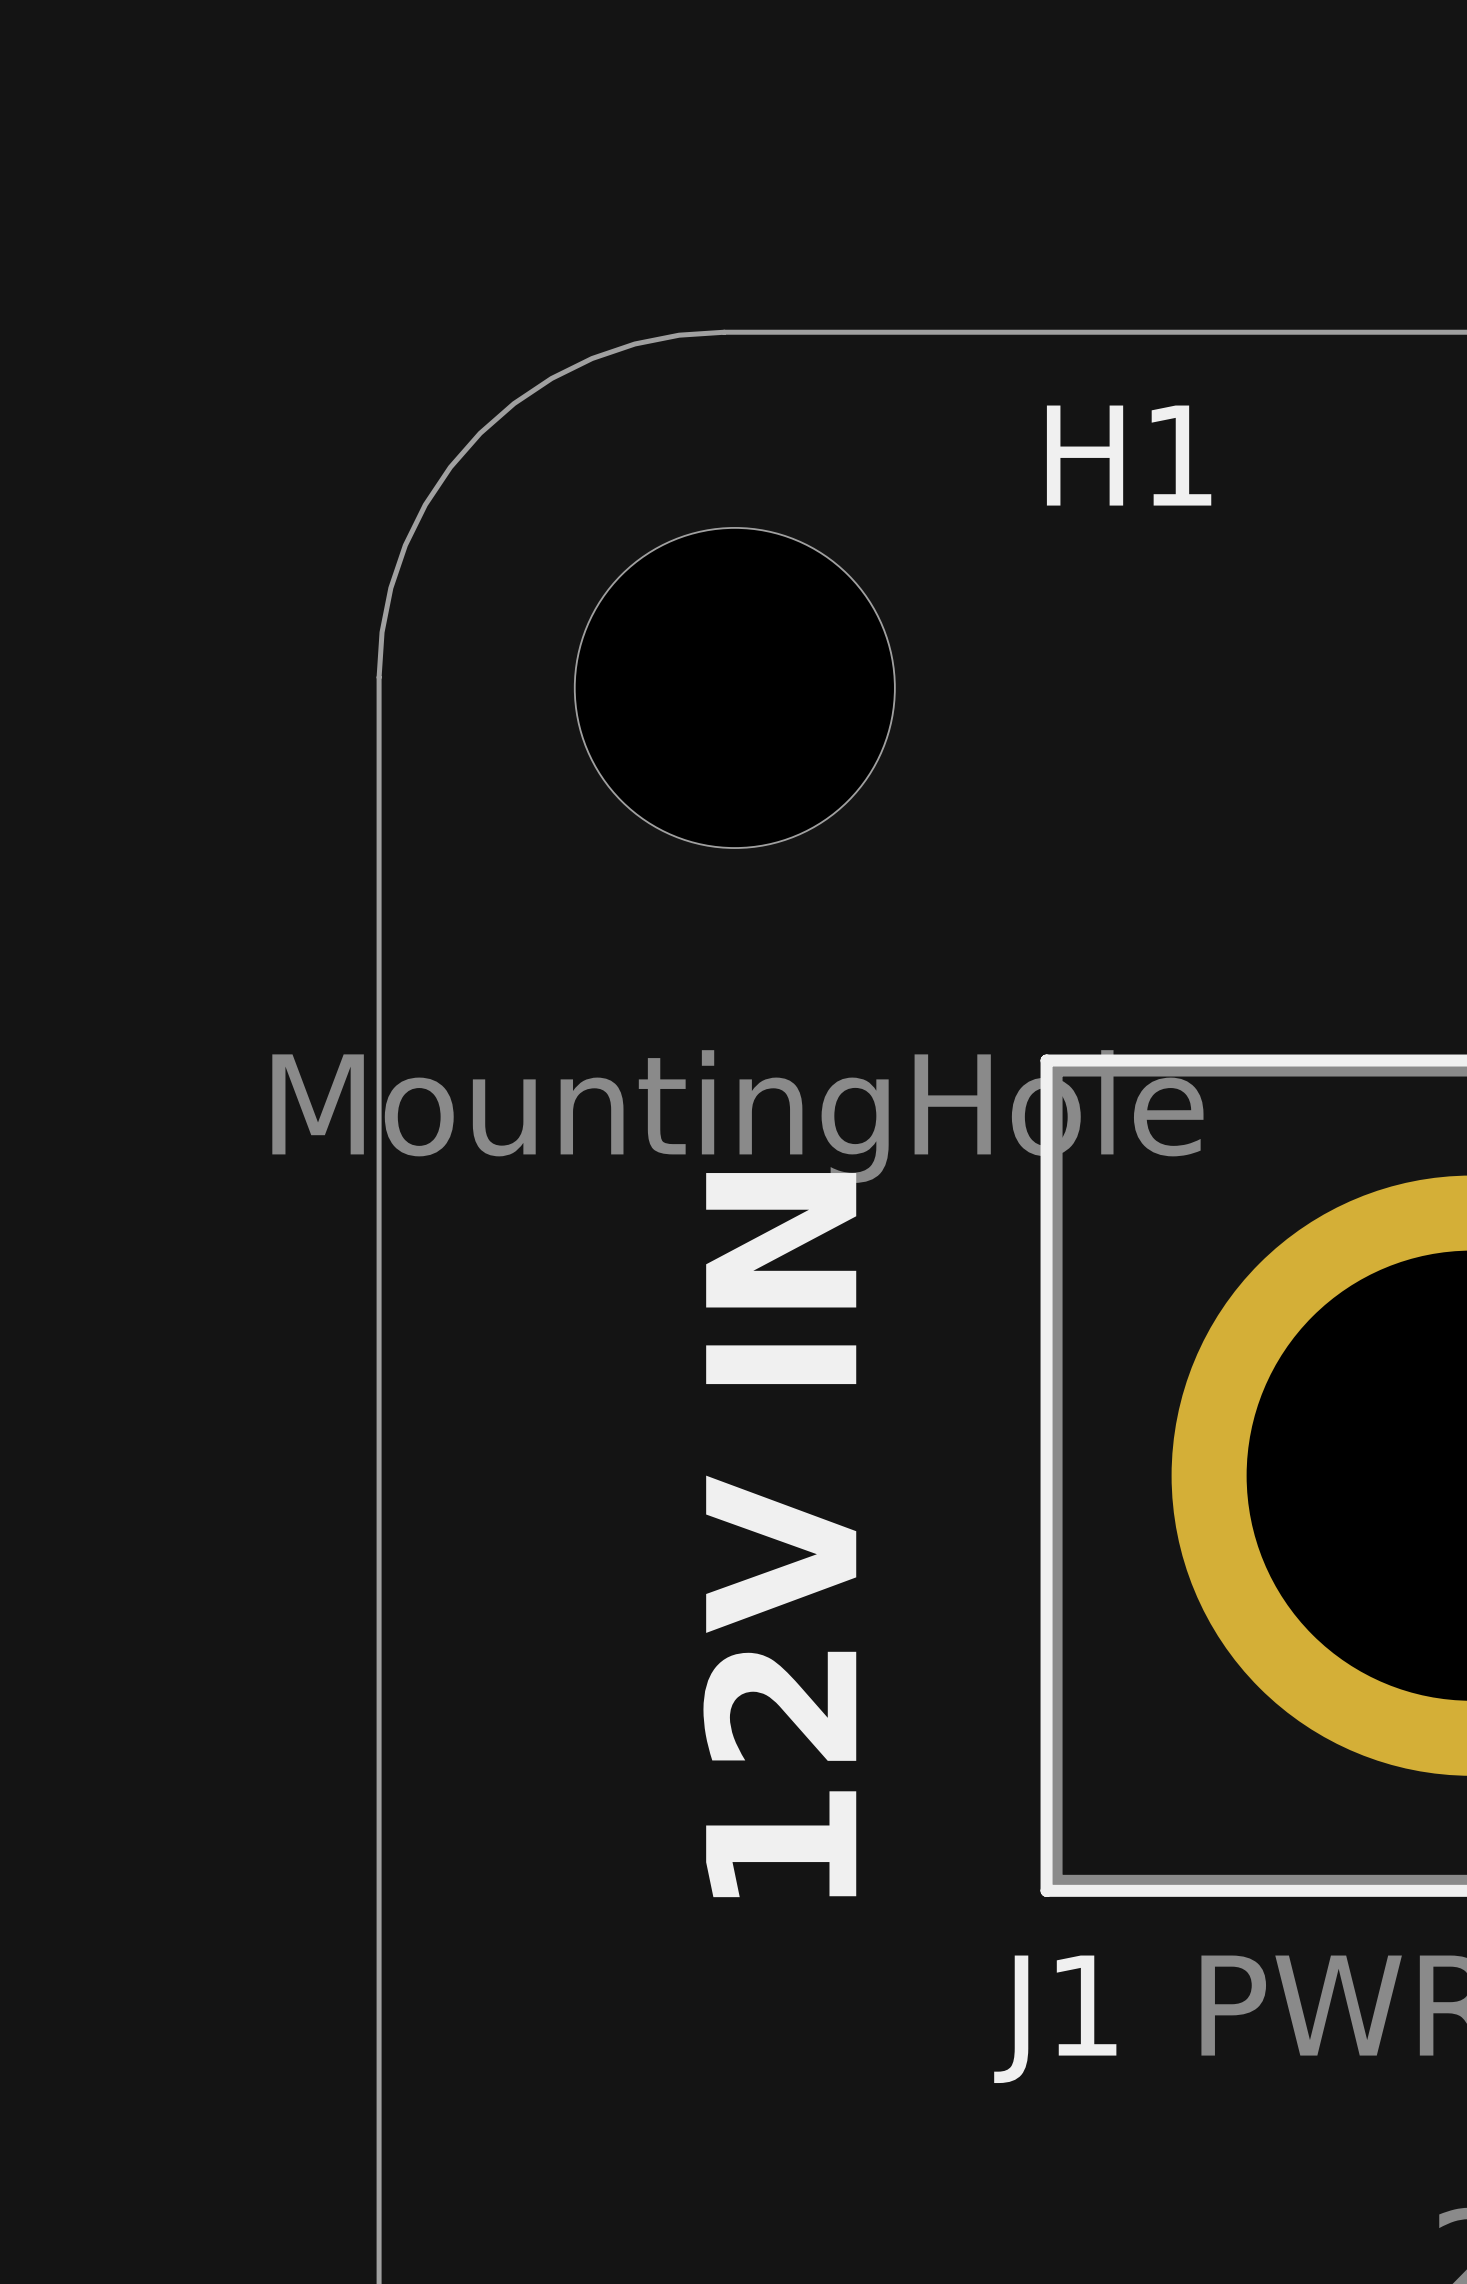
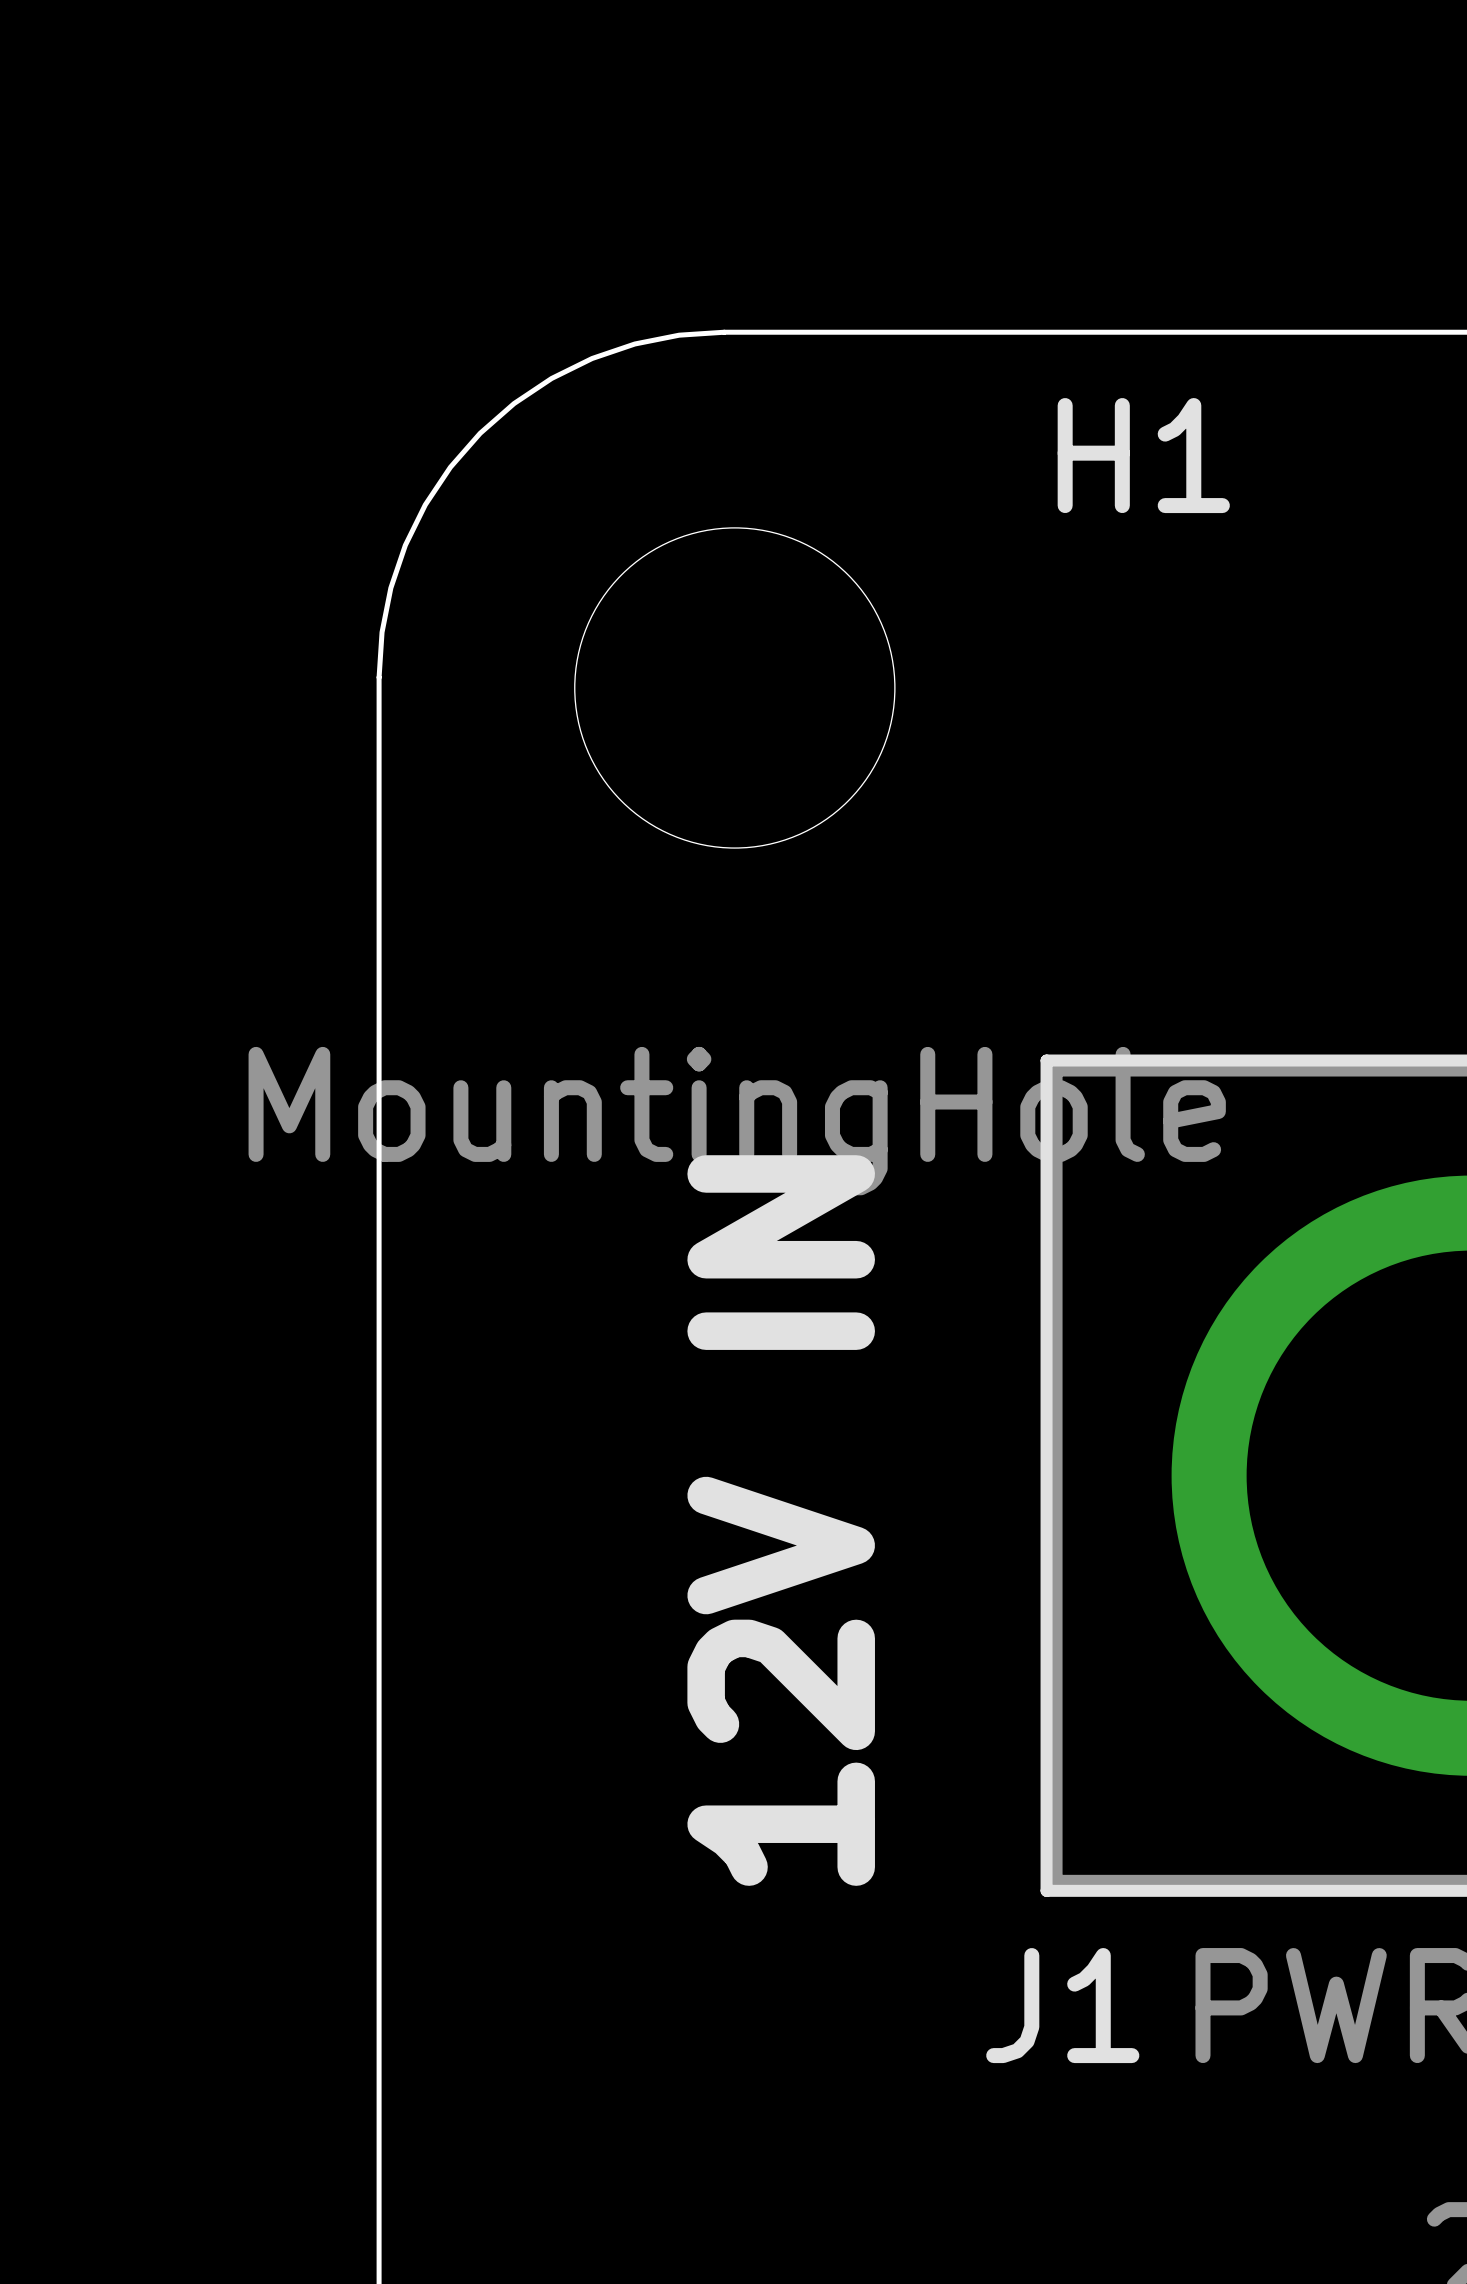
H1 name position: H1 (1129, 455) -> H1 (1143, 455)

